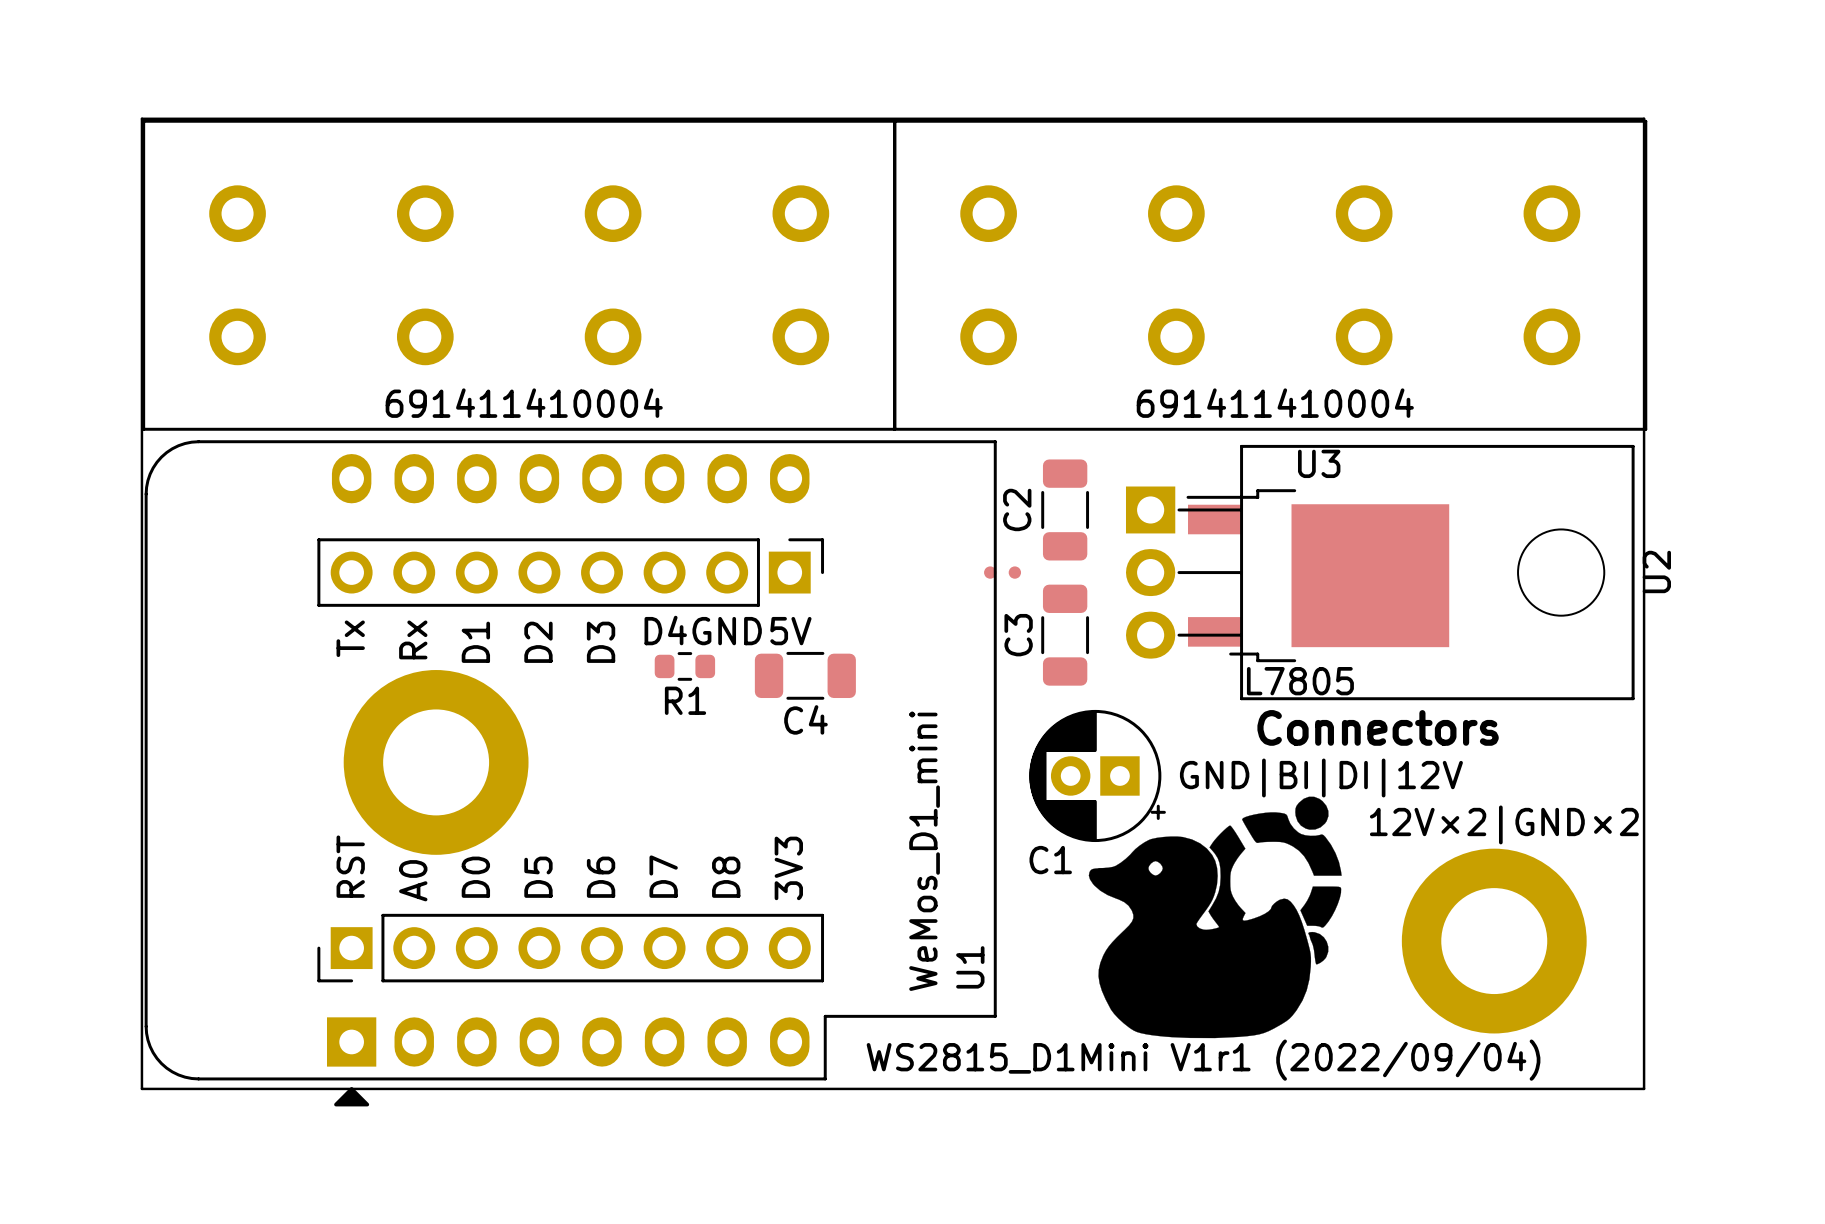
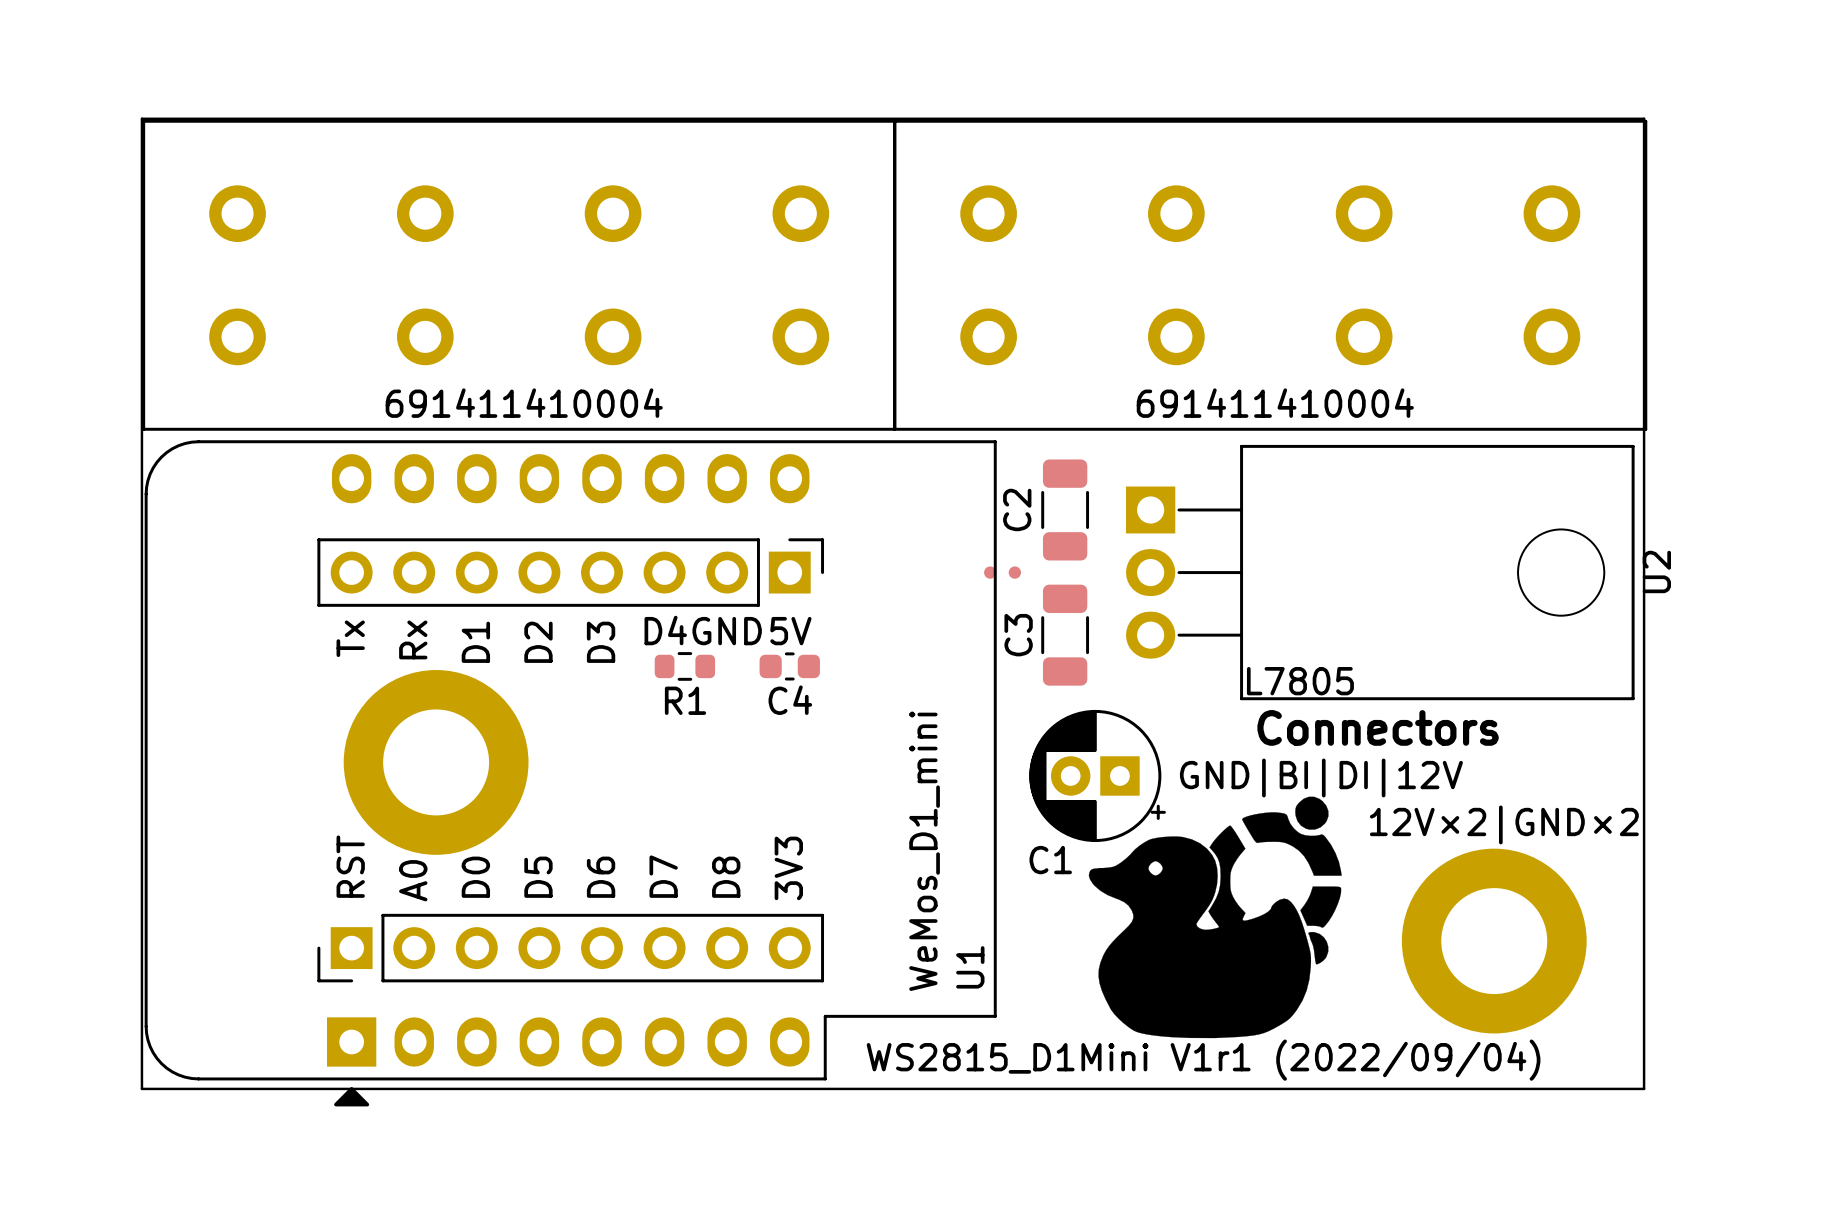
U3: (1317, 575) -> none
C4 footprint: [754, 651, 856, 700] -> [759, 652, 820, 681]

